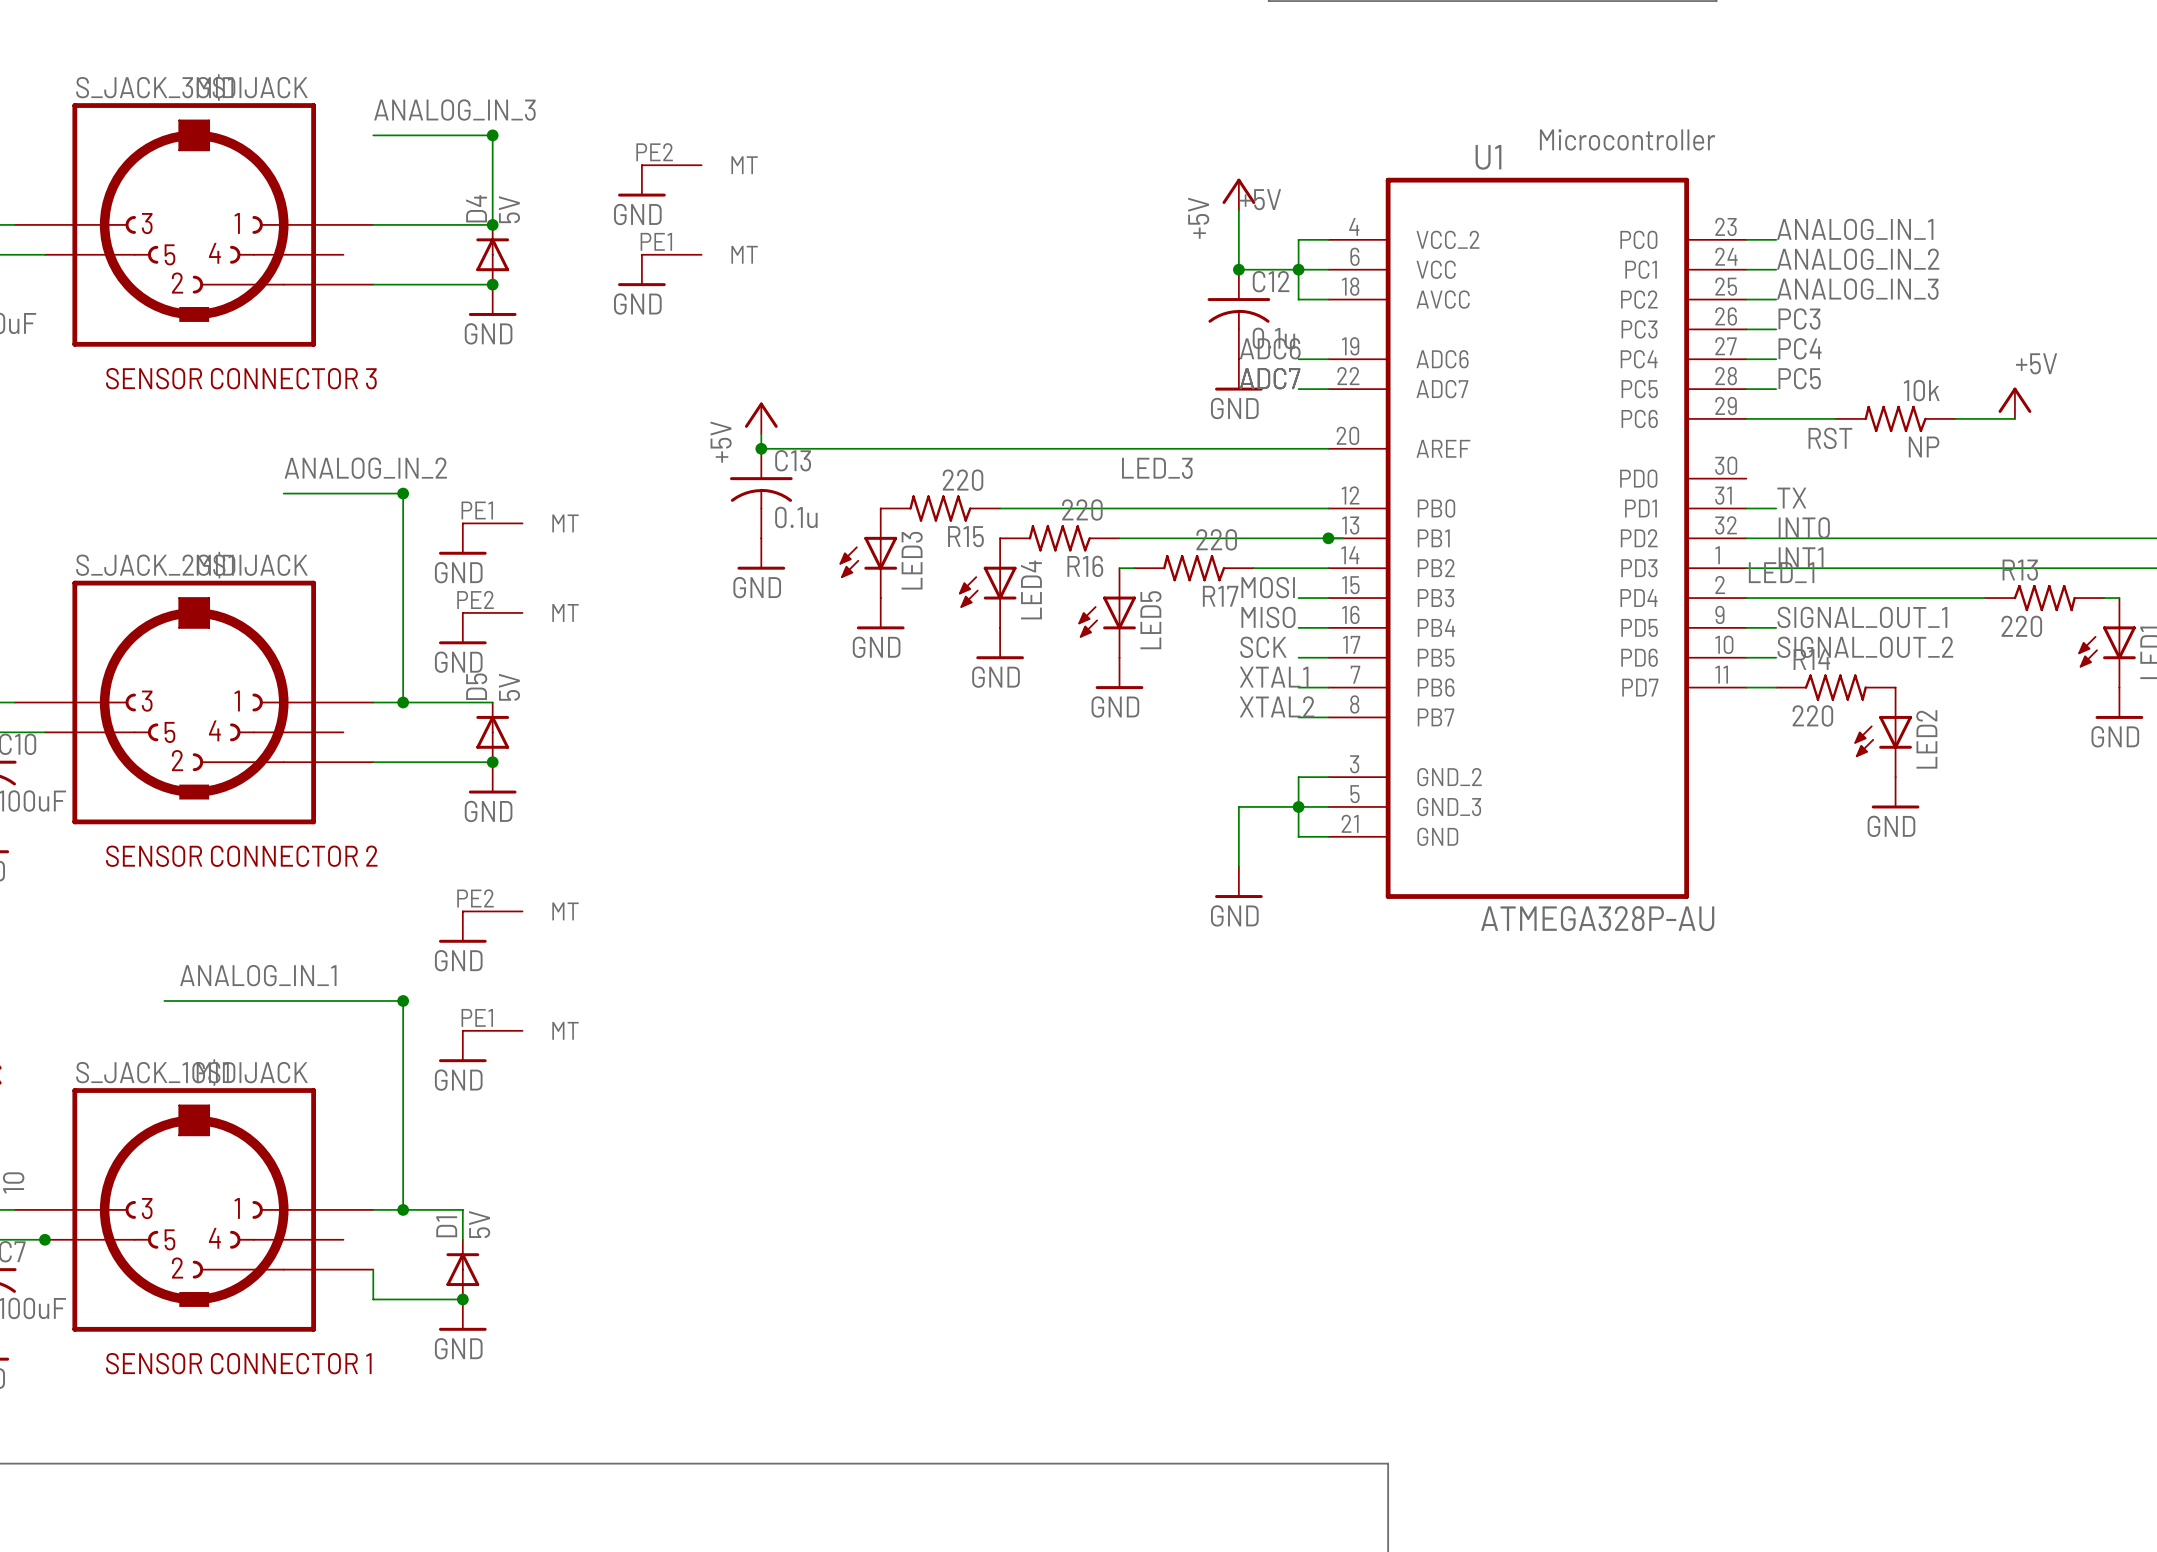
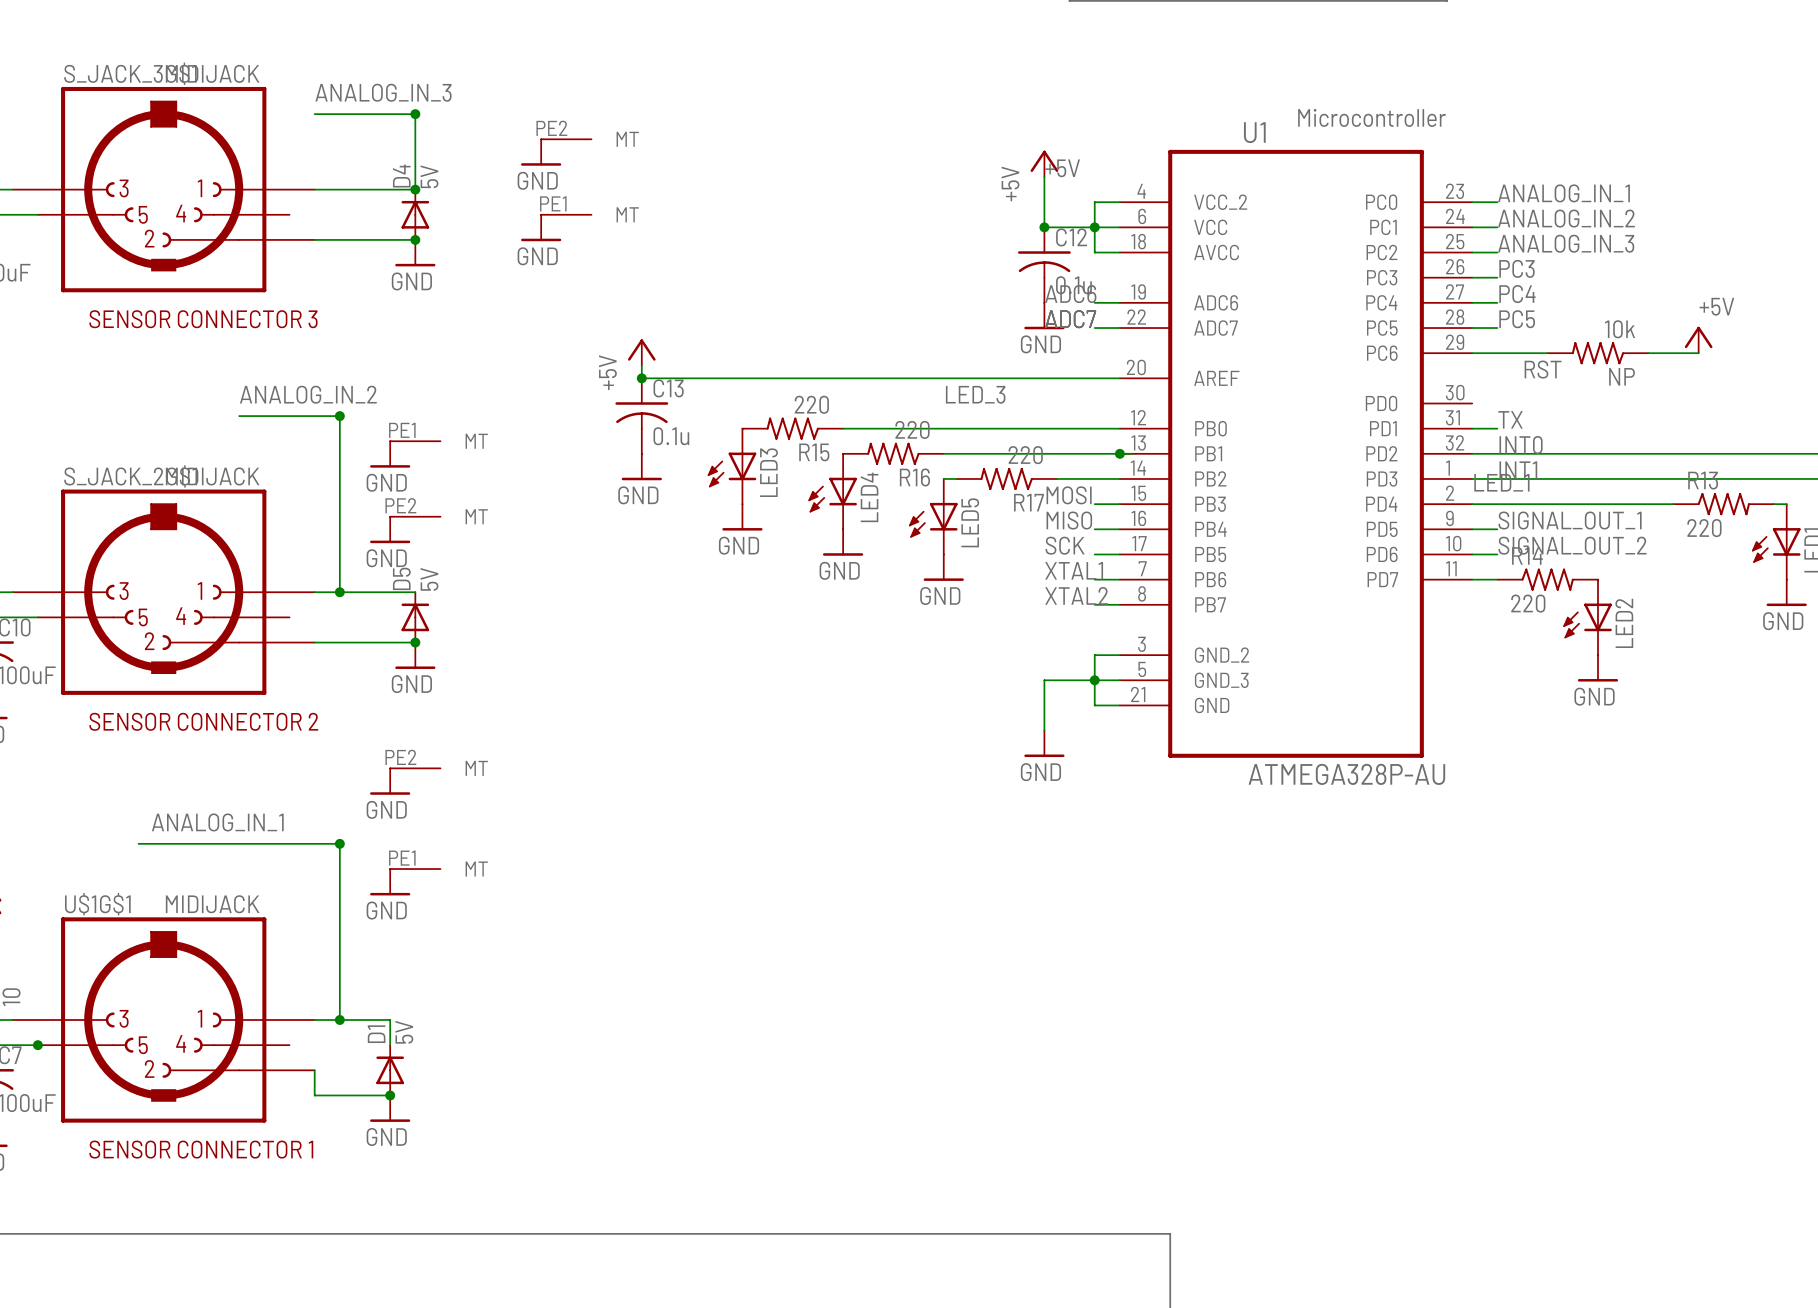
S_JACK_1G$1 name: S_JACK_1G$1 (152, 1072) -> U$1G$1 (97, 904)

